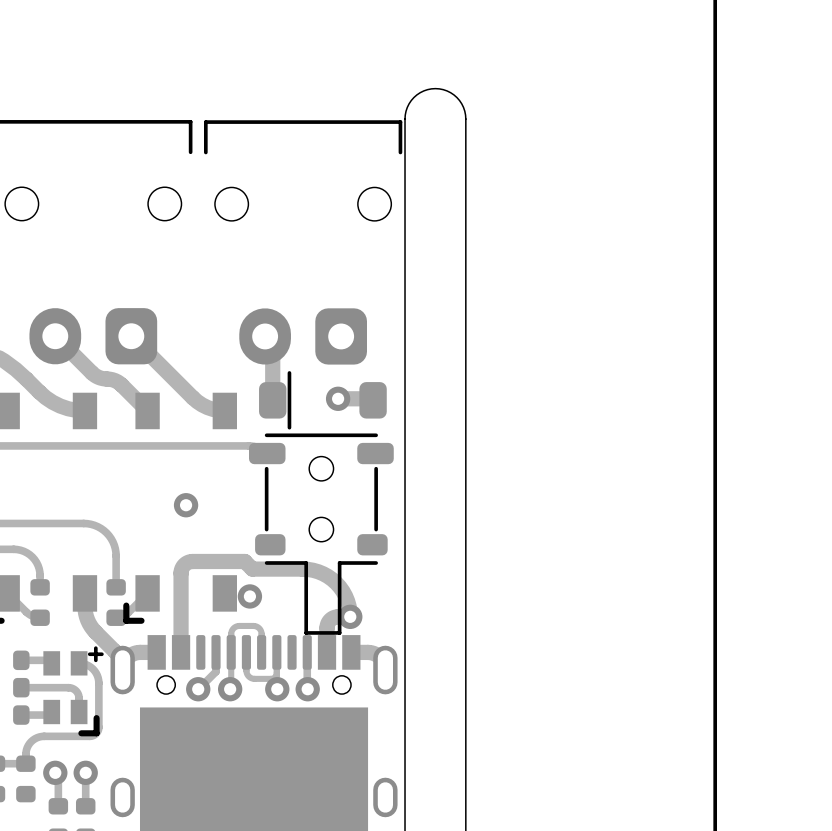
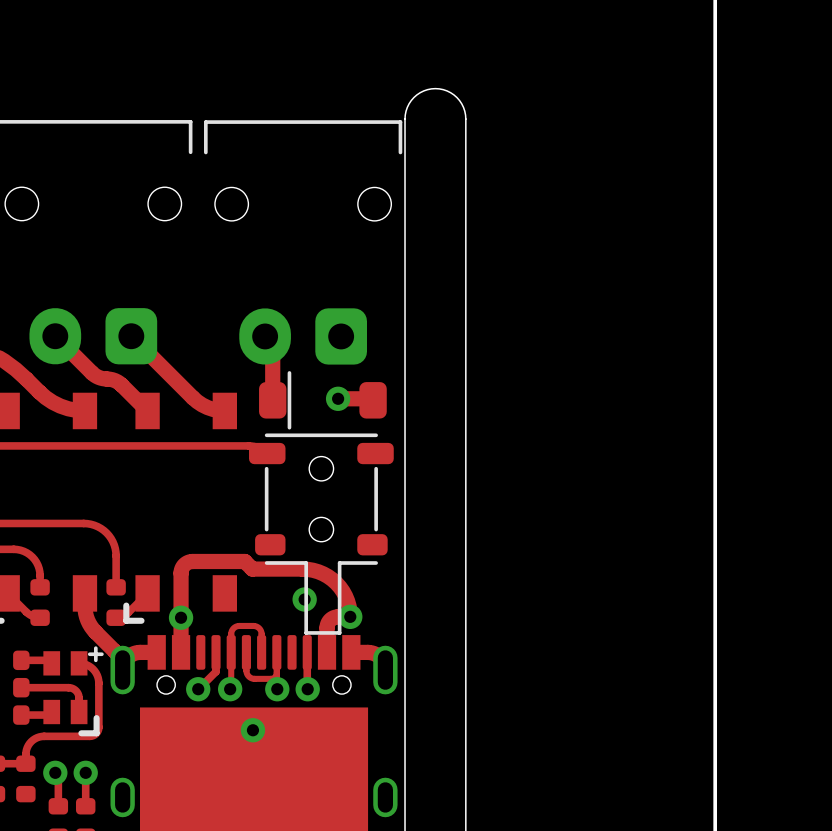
via: (186, 505) -> none
via: (249, 596) -> none
via: none -> (304, 599)
via: none -> (181, 617)
via: none -> (252, 730)

